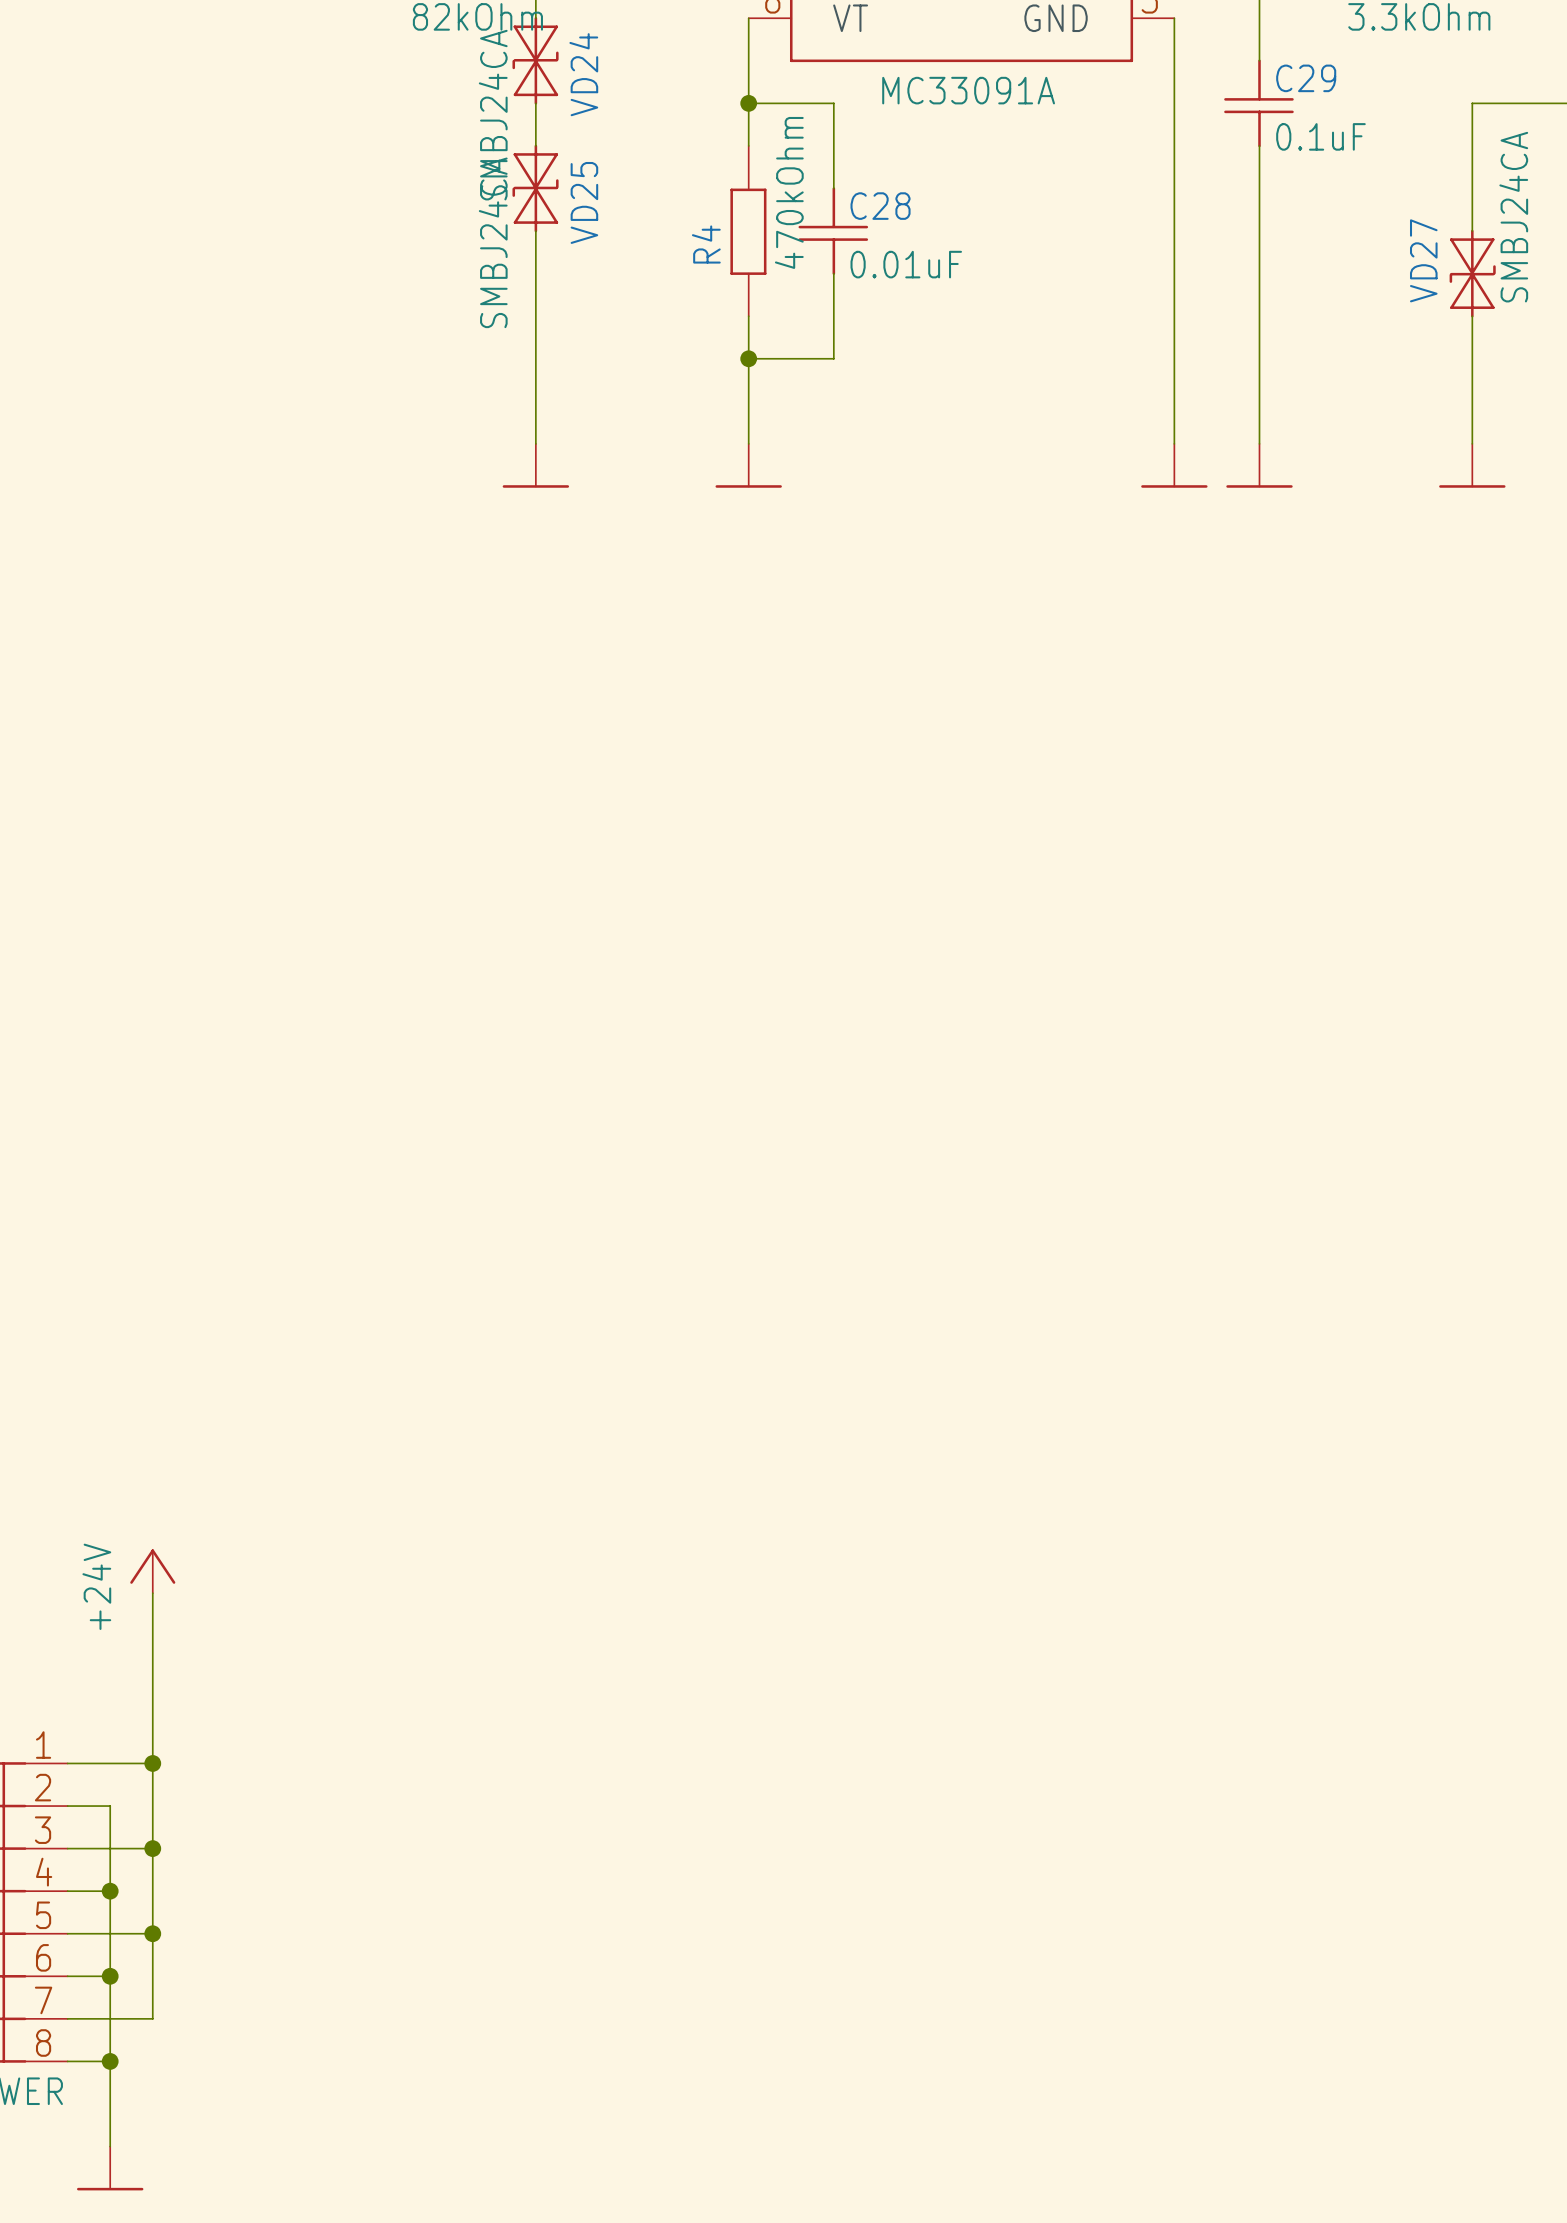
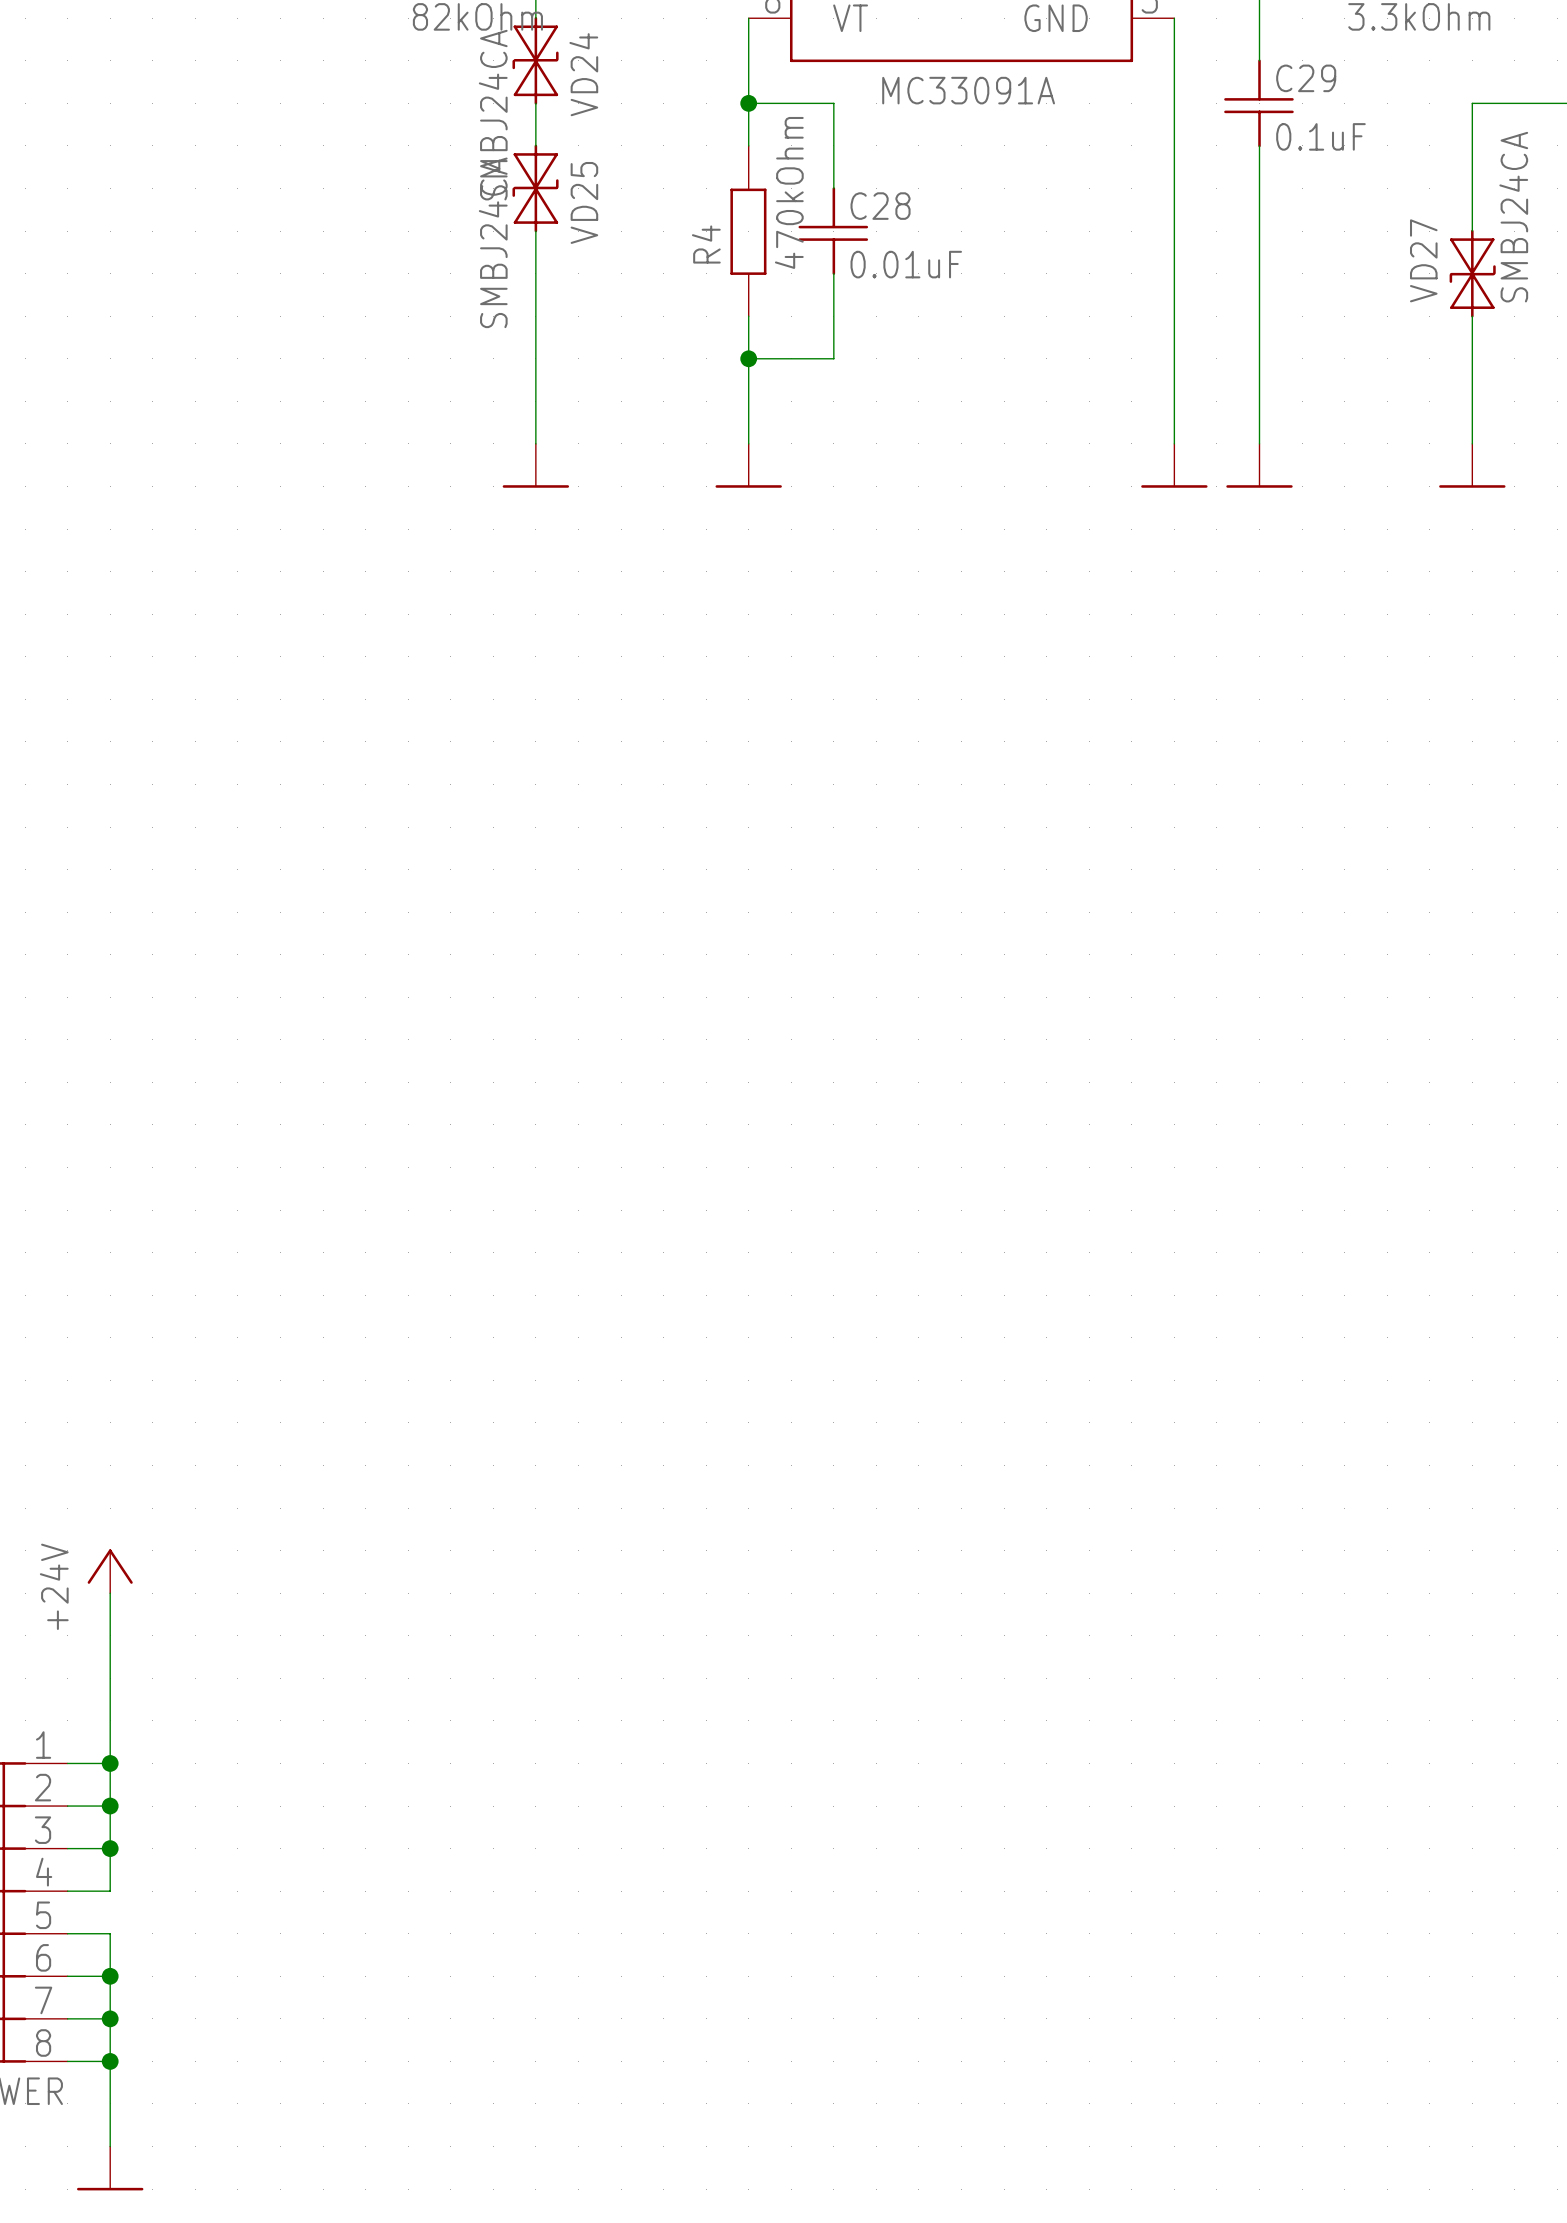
power symbol position: +24V (152, 1571) -> +24V (110, 1571)
wire: none -> (110, 1593) (110, 1806)
wire: (152, 1593) (152, 2018) (110, 2018) -> none
wire: (110, 1763) (152, 1763) -> none
junction: none -> (110, 1763)
junction: (152, 1763) -> none
junction: none -> (110, 1806)
wire: (110, 1848) (152, 1848) -> none
junction: none -> (110, 1848)
junction: (152, 1848) -> none
wire: (110, 1891) (110, 1933) (152, 1933) -> none
junction: (110, 1891) -> none
junction: (152, 1933) -> none
junction: none -> (110, 2018)

